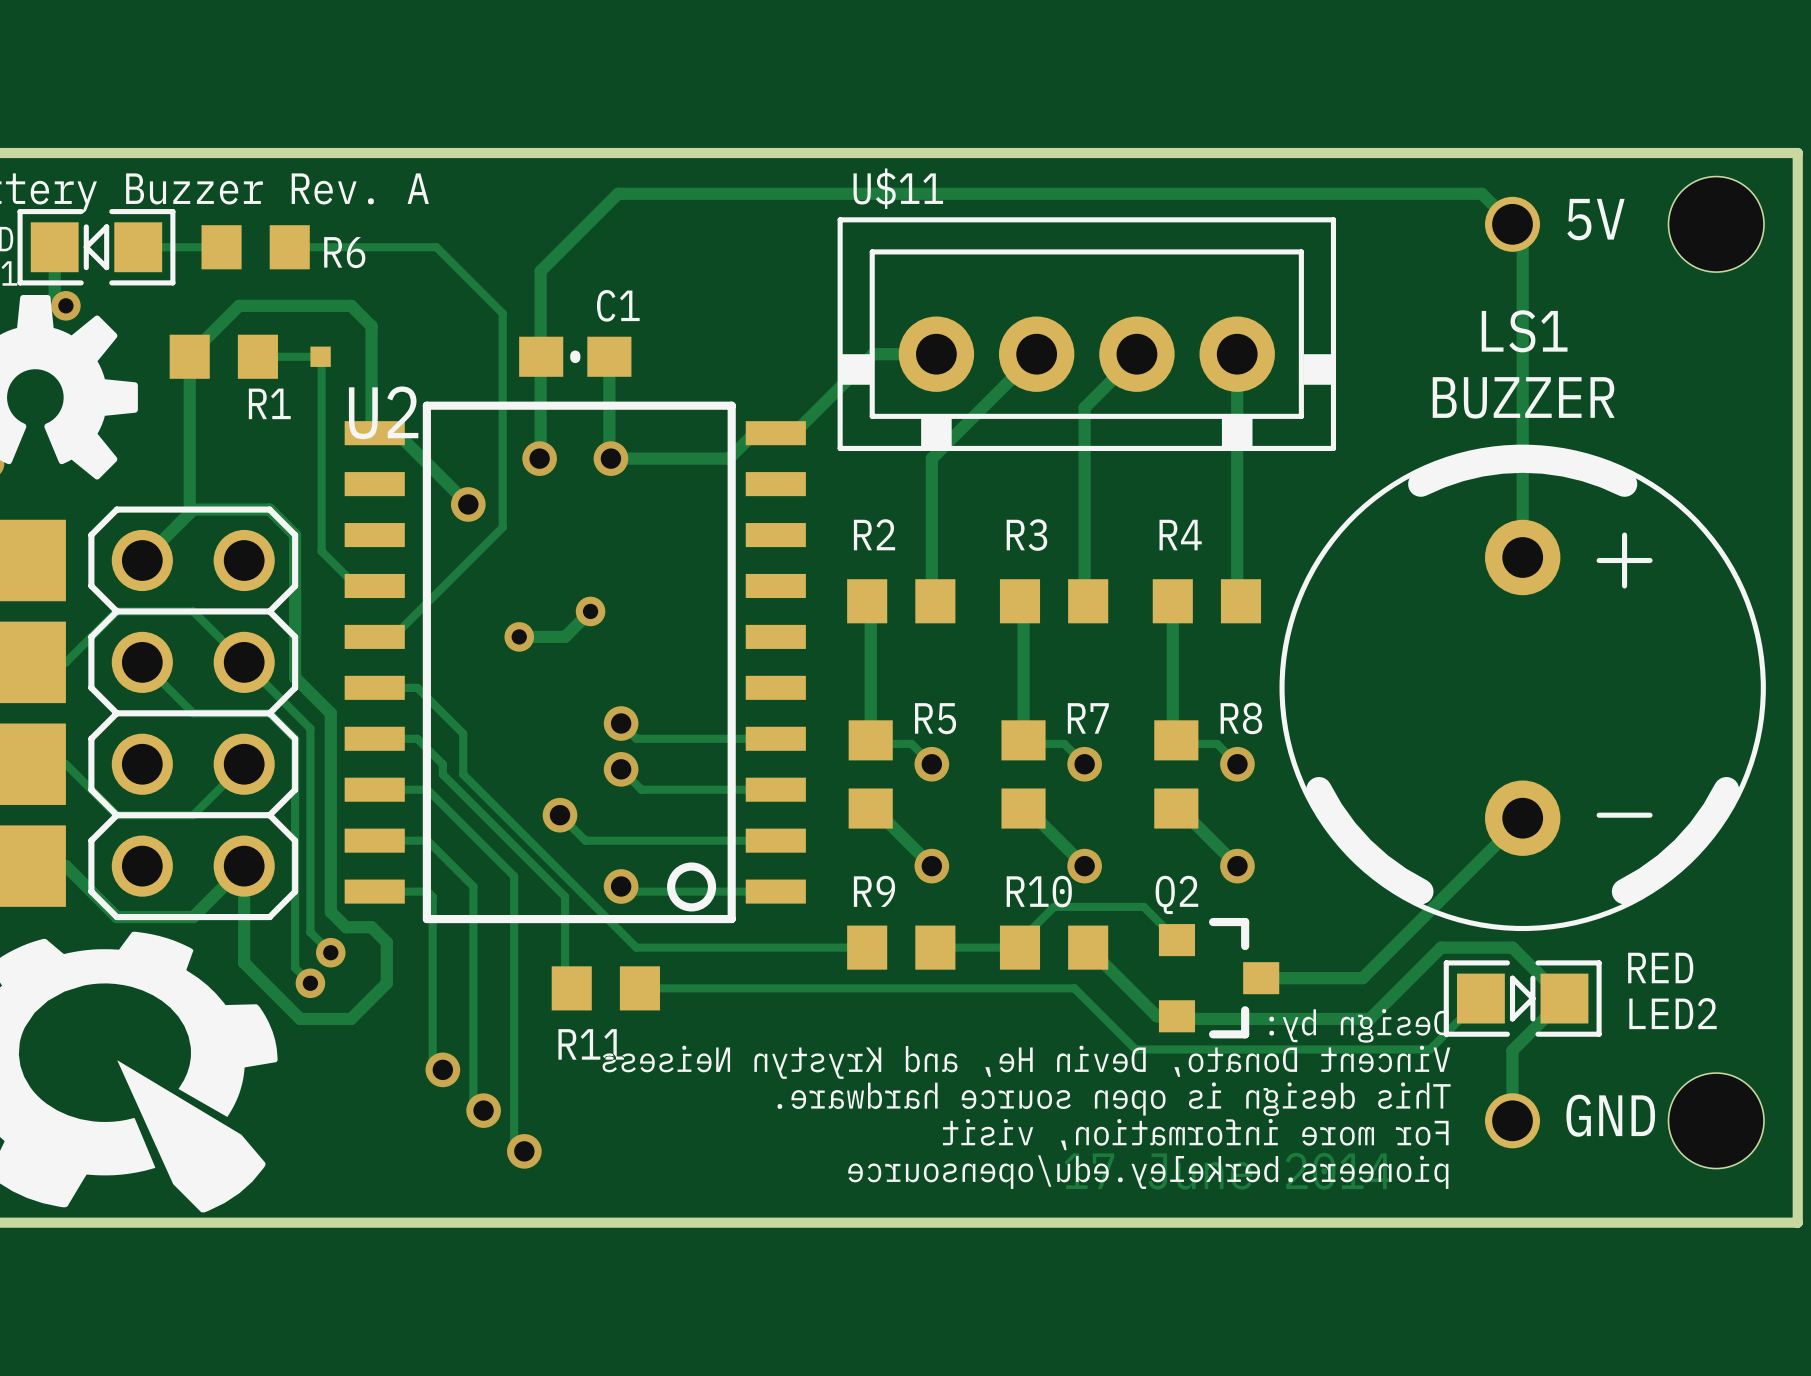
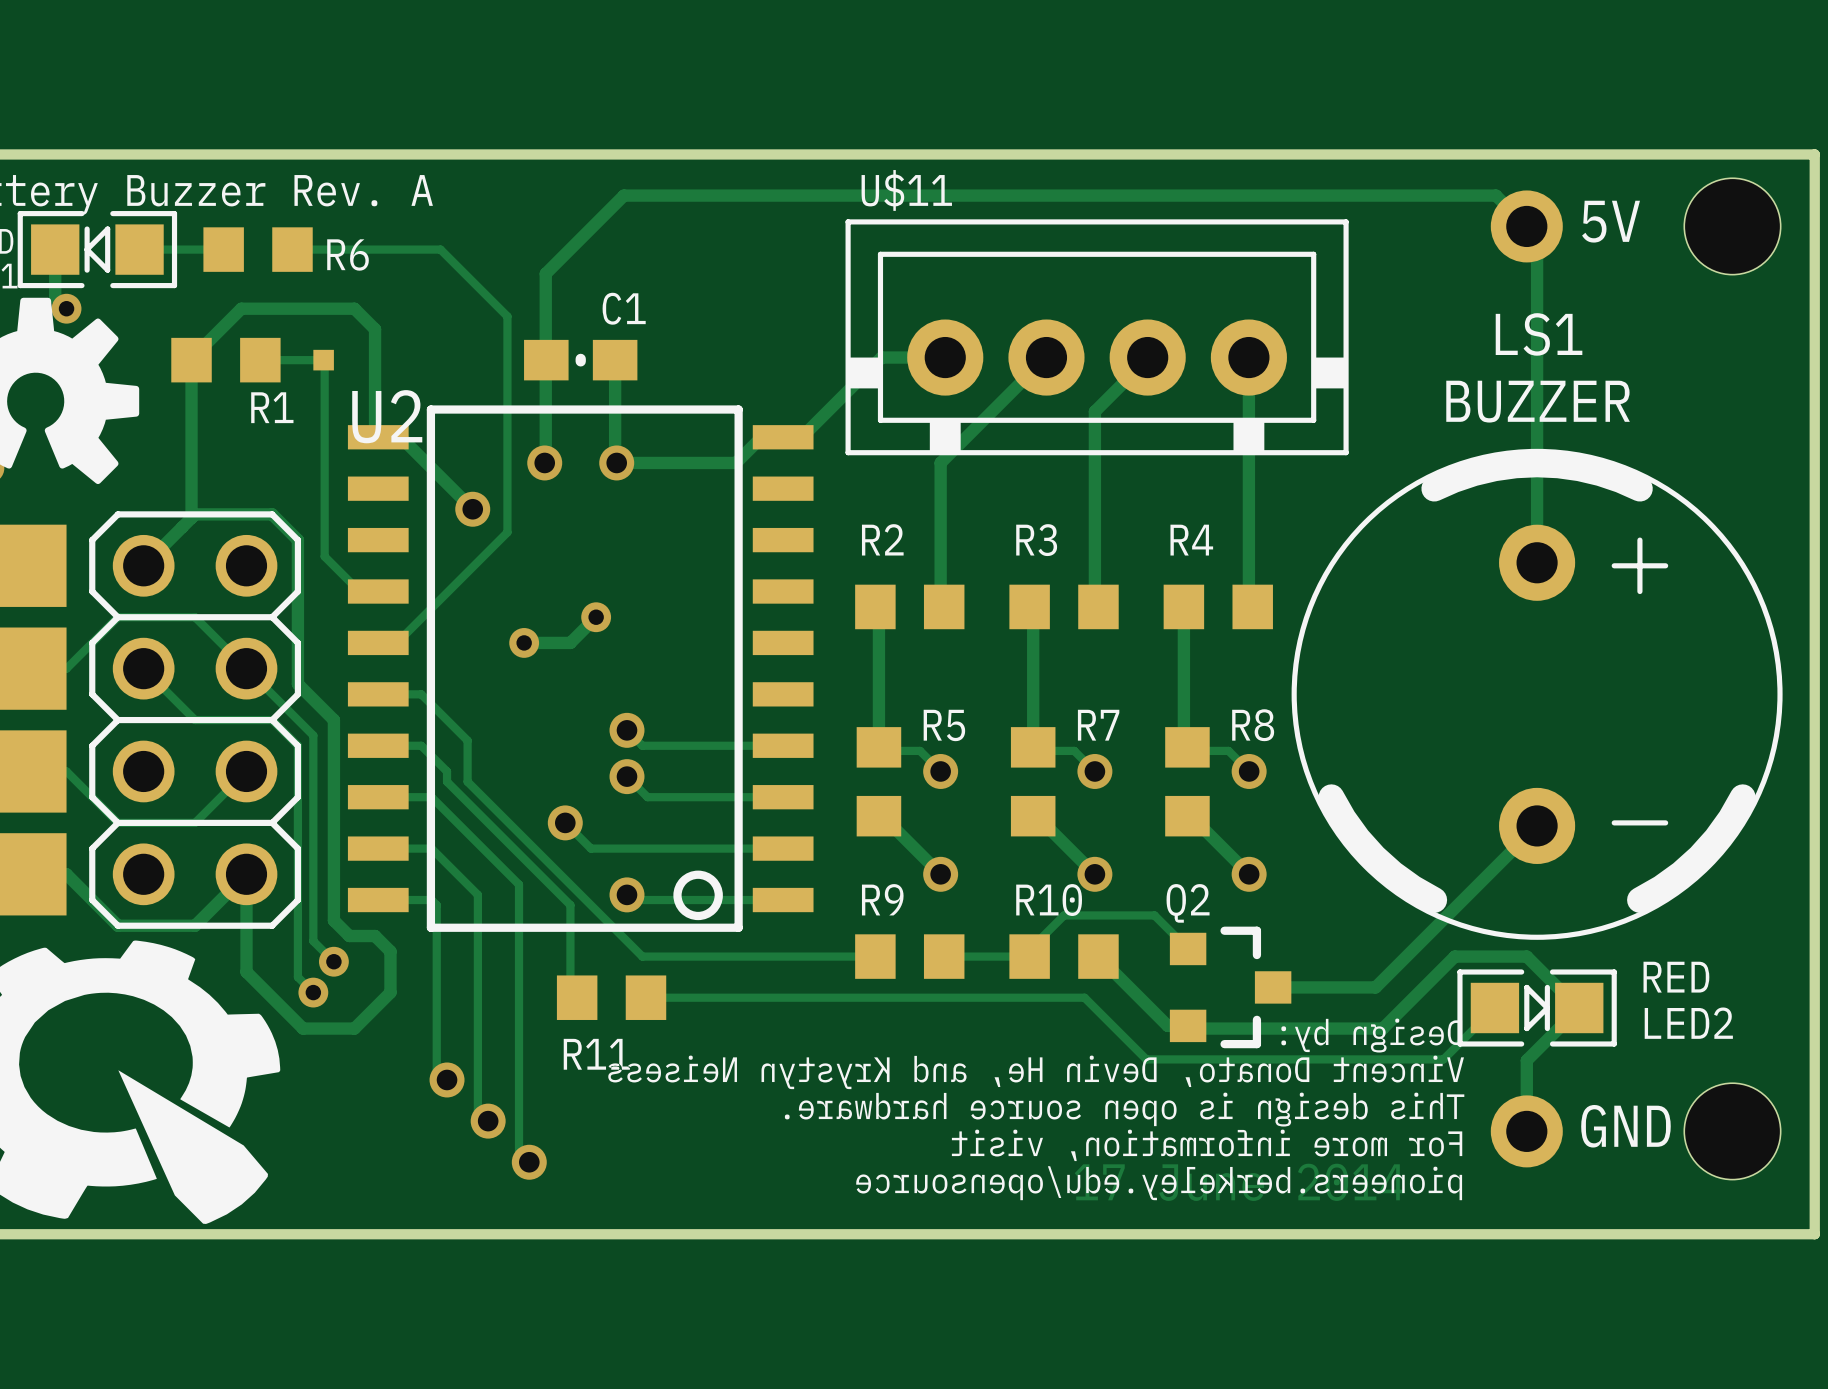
5V footprint: [1485, 176, 1765, 273] -> [1490, 178, 1781, 275]
GND footprint: [1485, 1073, 1765, 1169] -> [1490, 1083, 1781, 1180]

